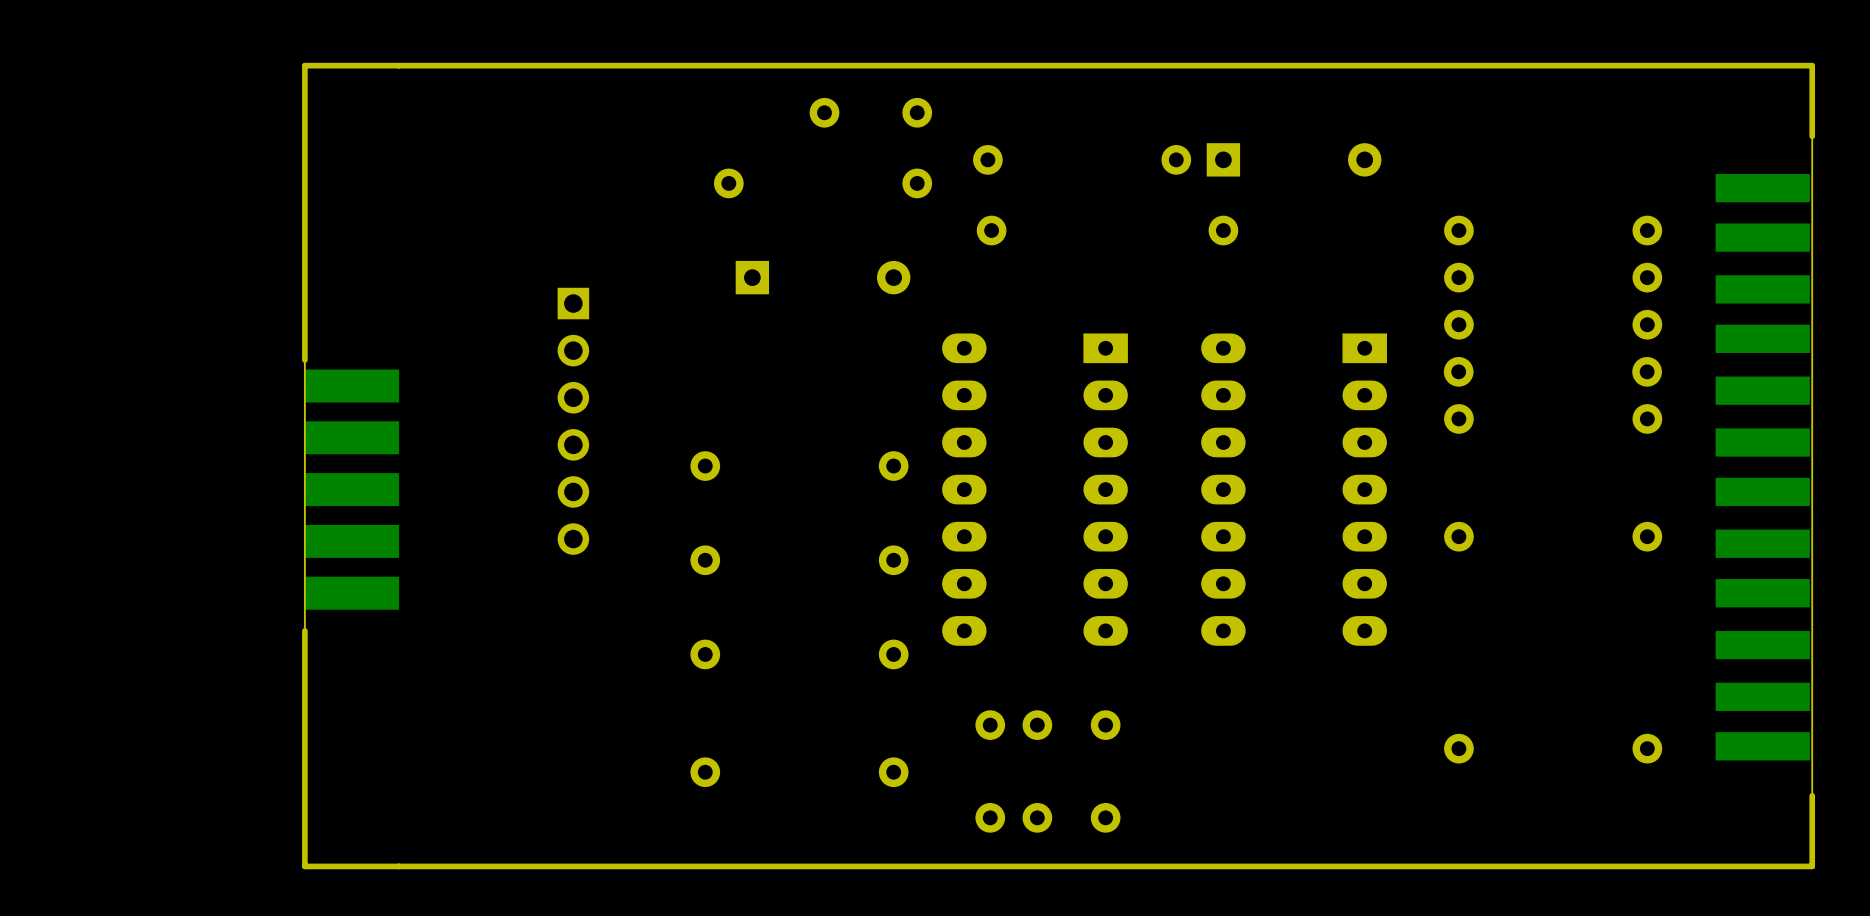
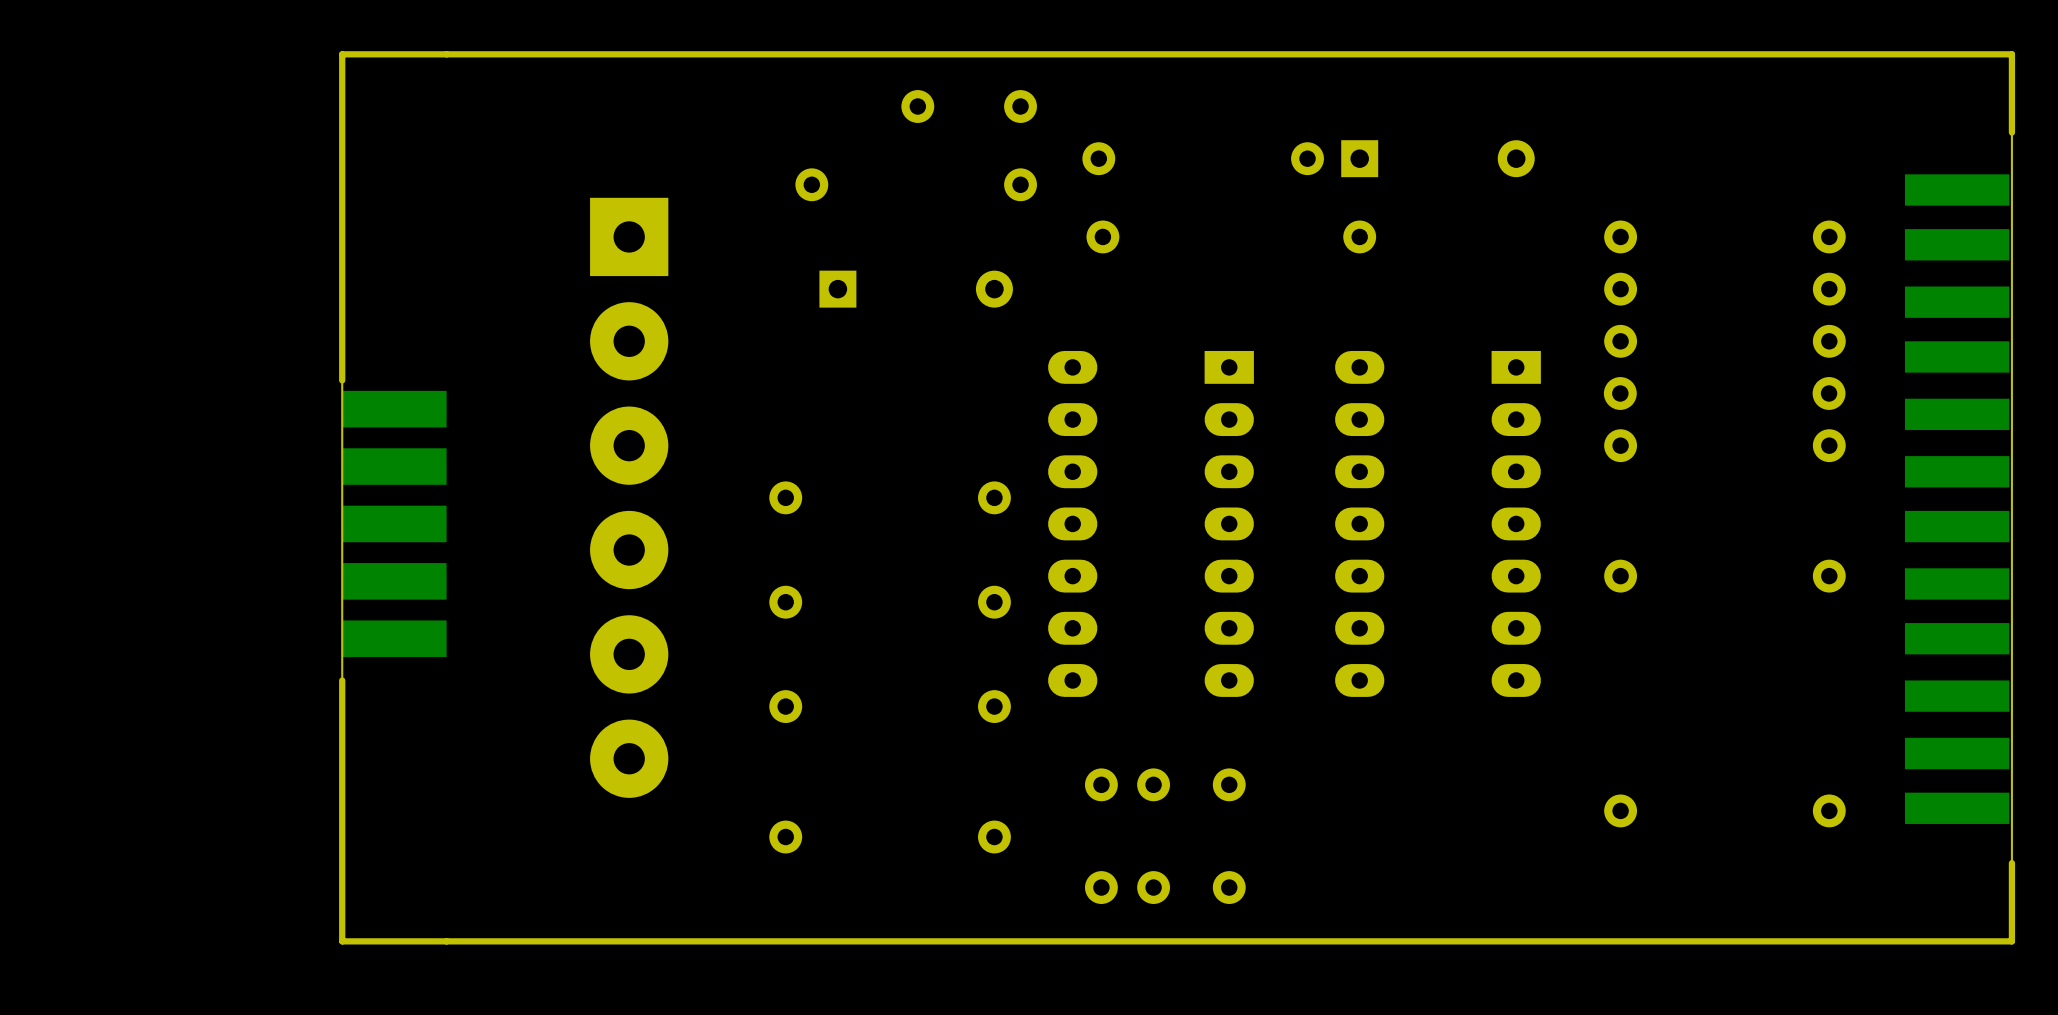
part: (573, 421) -> none
part: none -> (629, 497)

